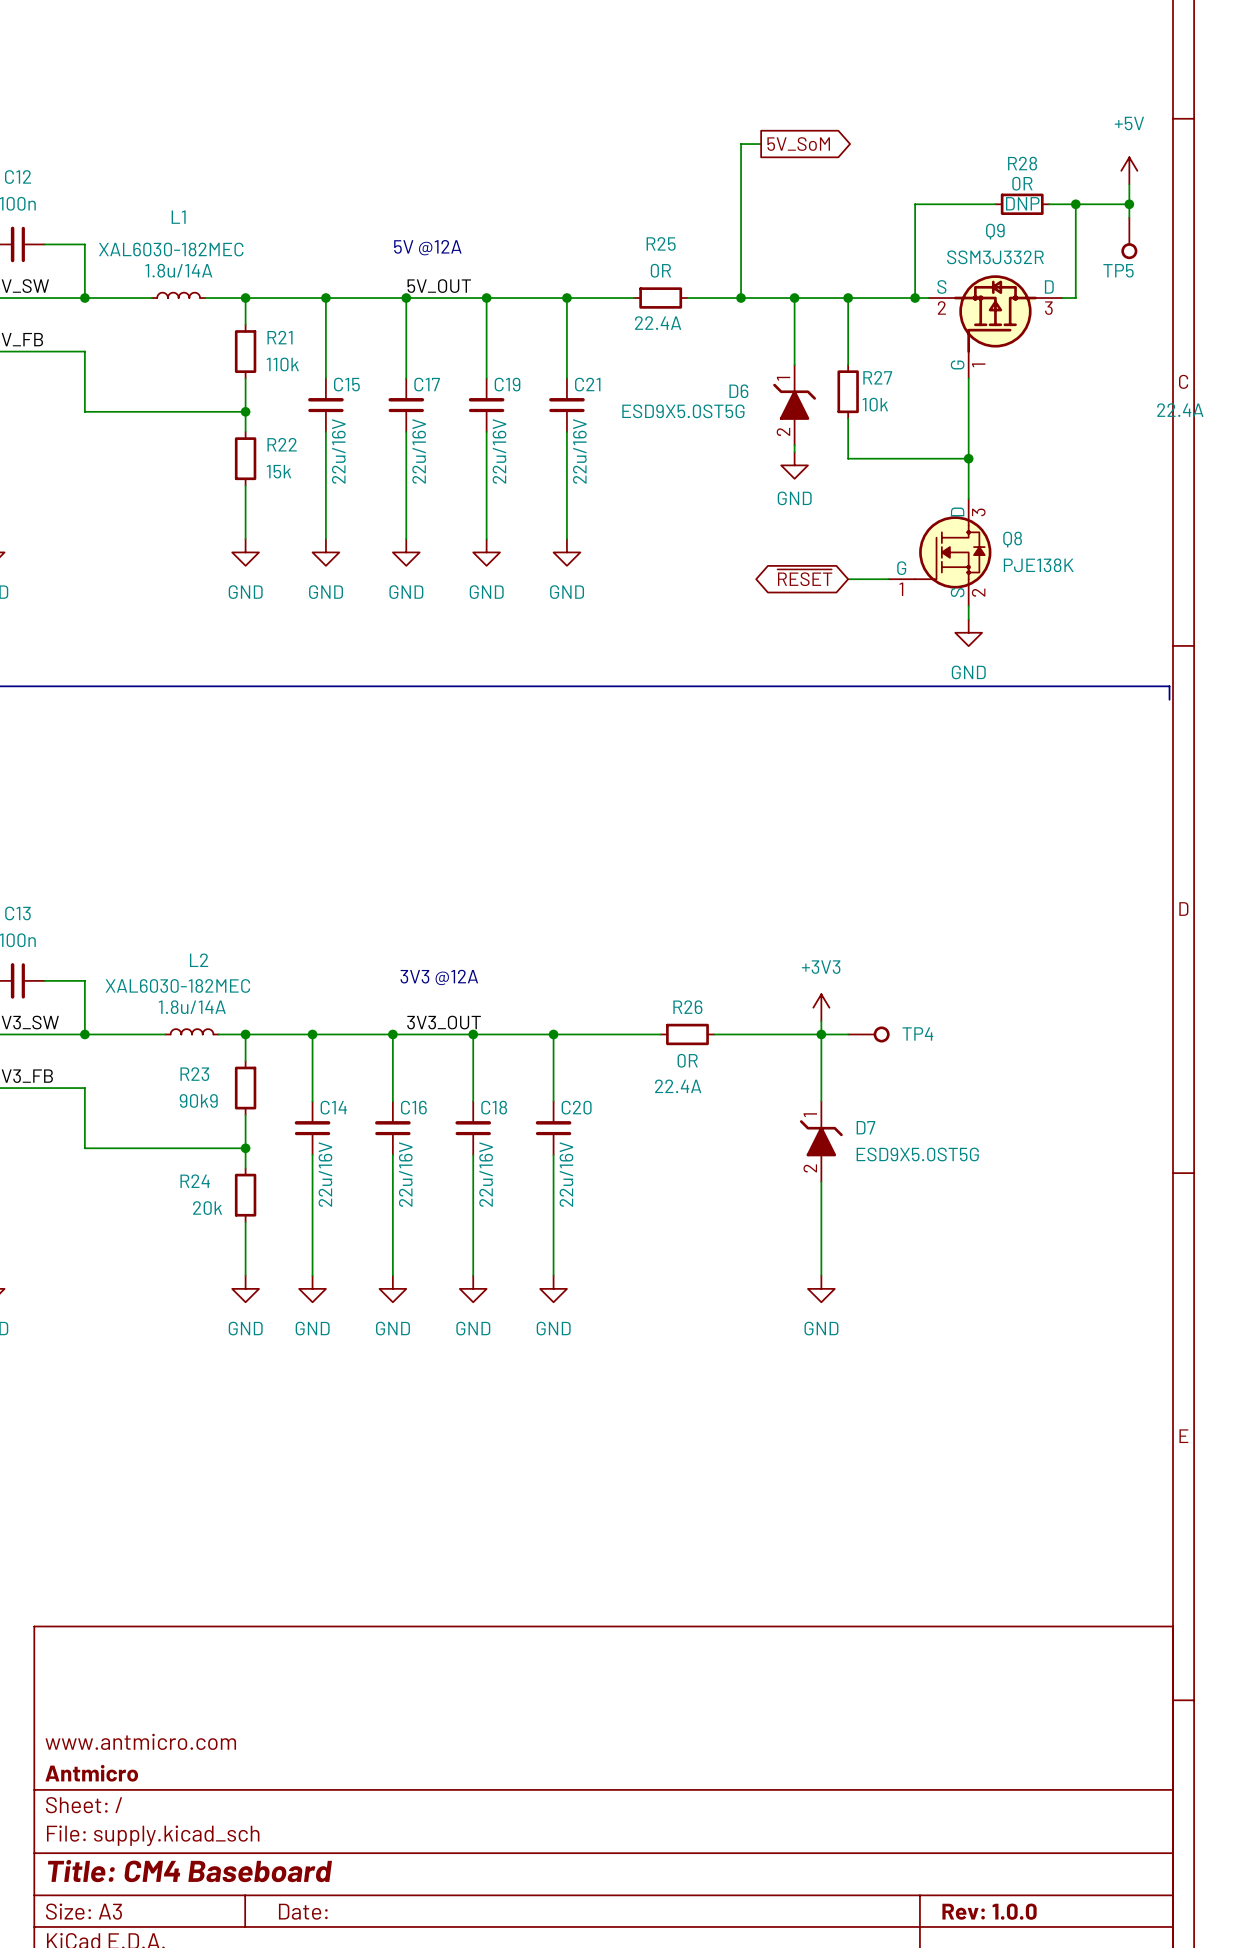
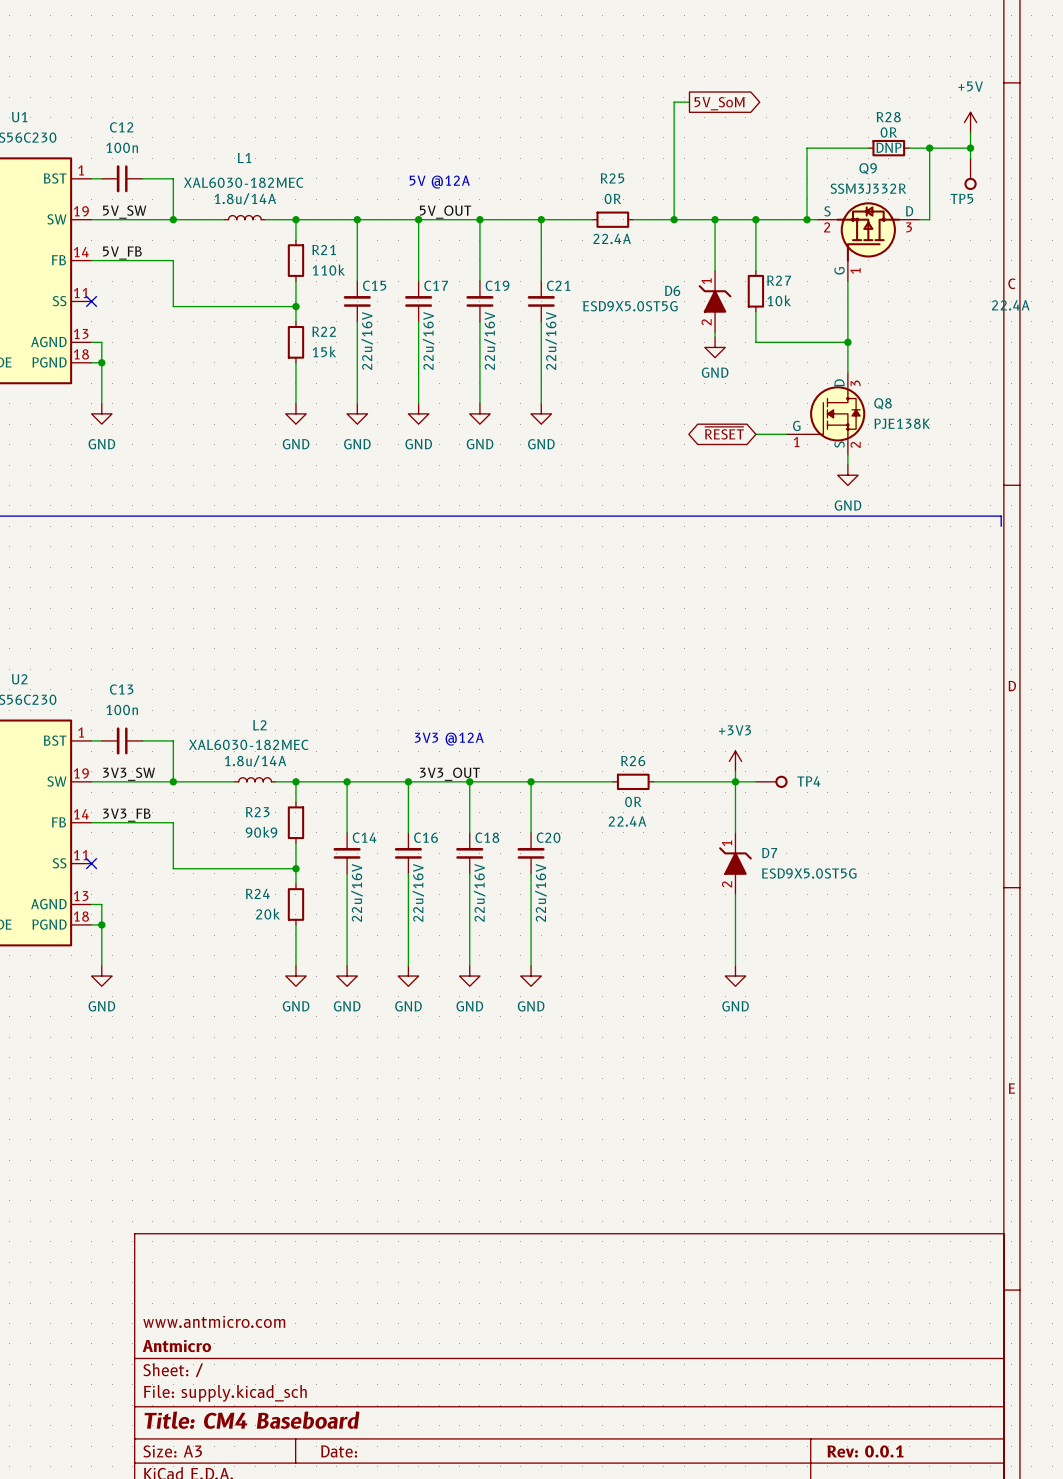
title block: Rev: 1.0.0 (989, 1911) -> Rev: 0.0.1 (865, 1451)

